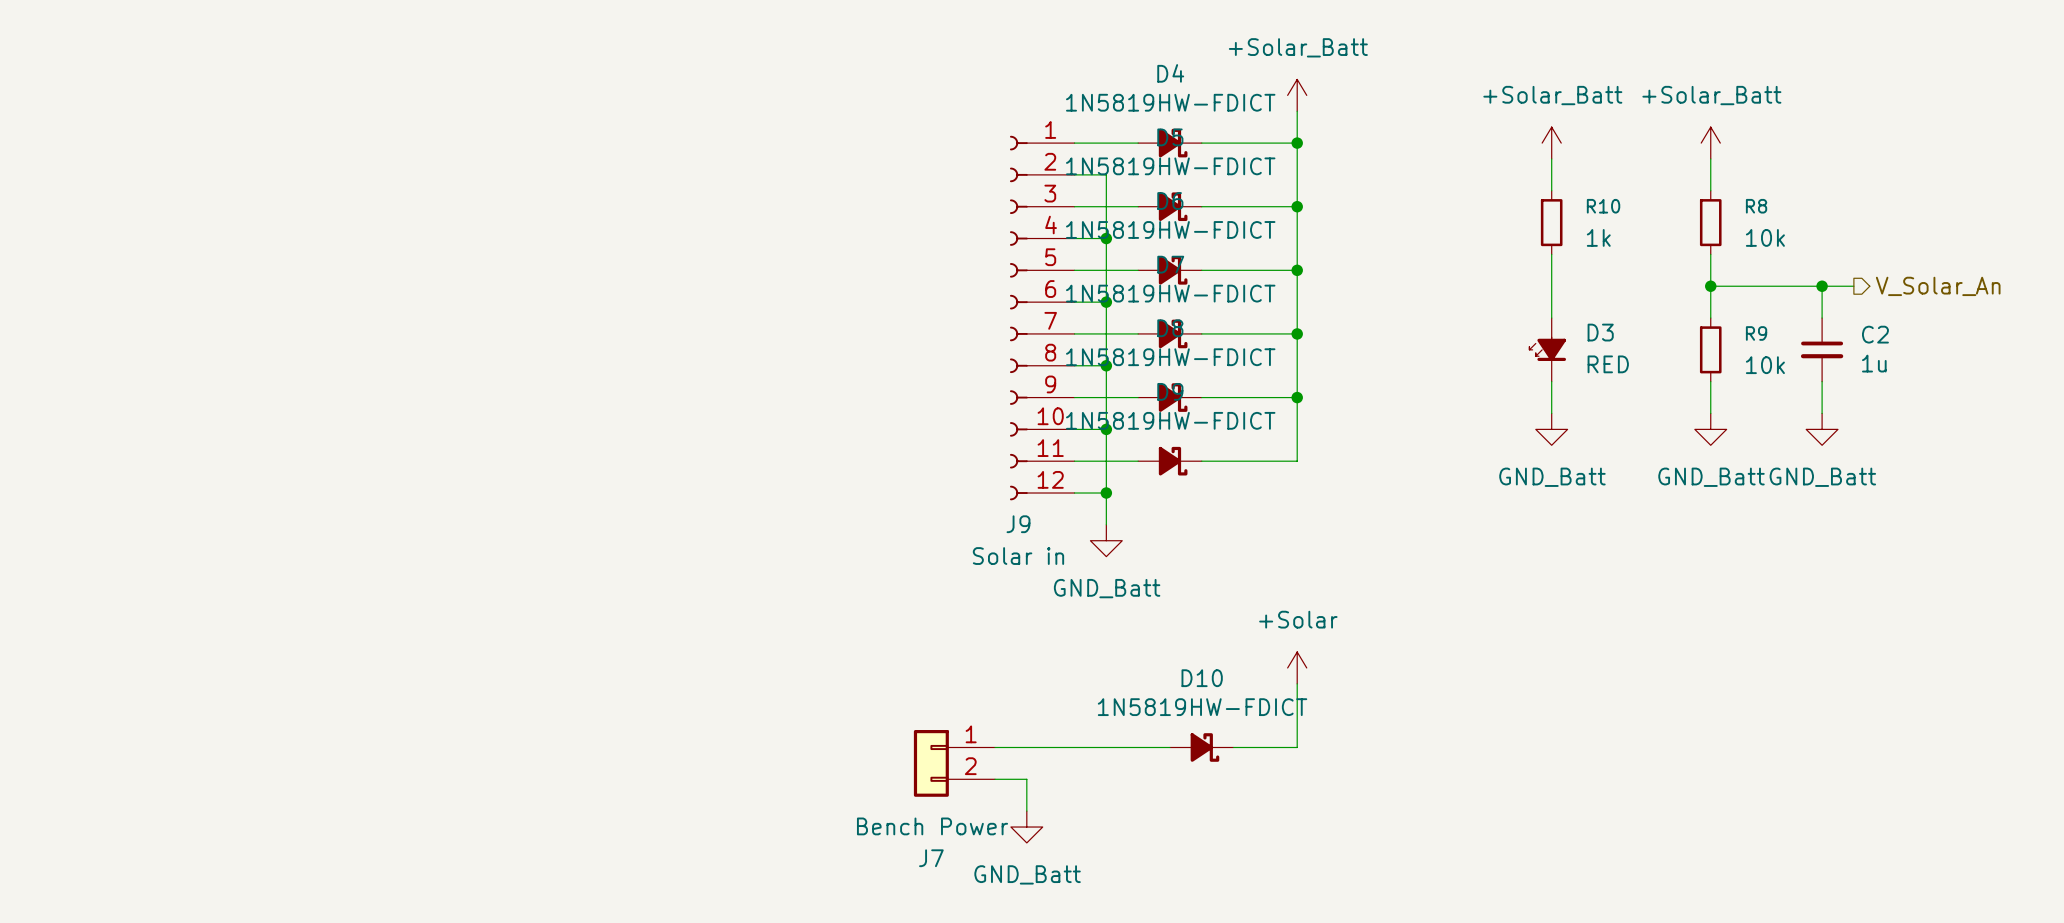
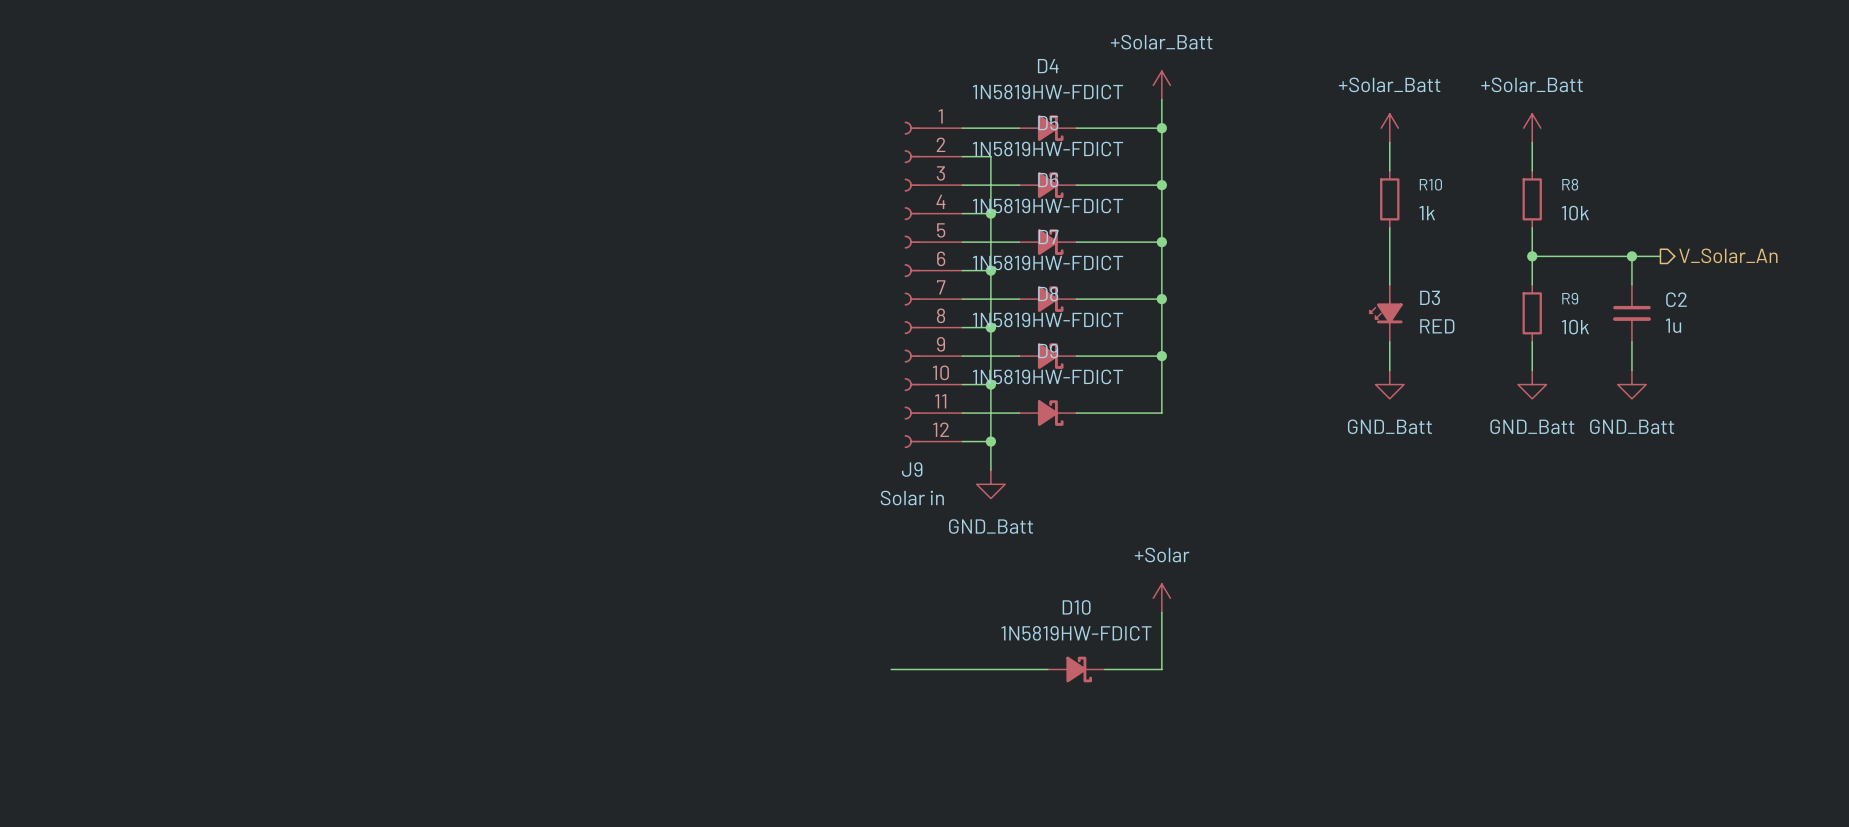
J7: Bench Power (954, 763) -> none
wire: (995, 779) (1026, 779) (1026, 811) -> none
power symbol: GND_Batt (1026, 827) -> none

